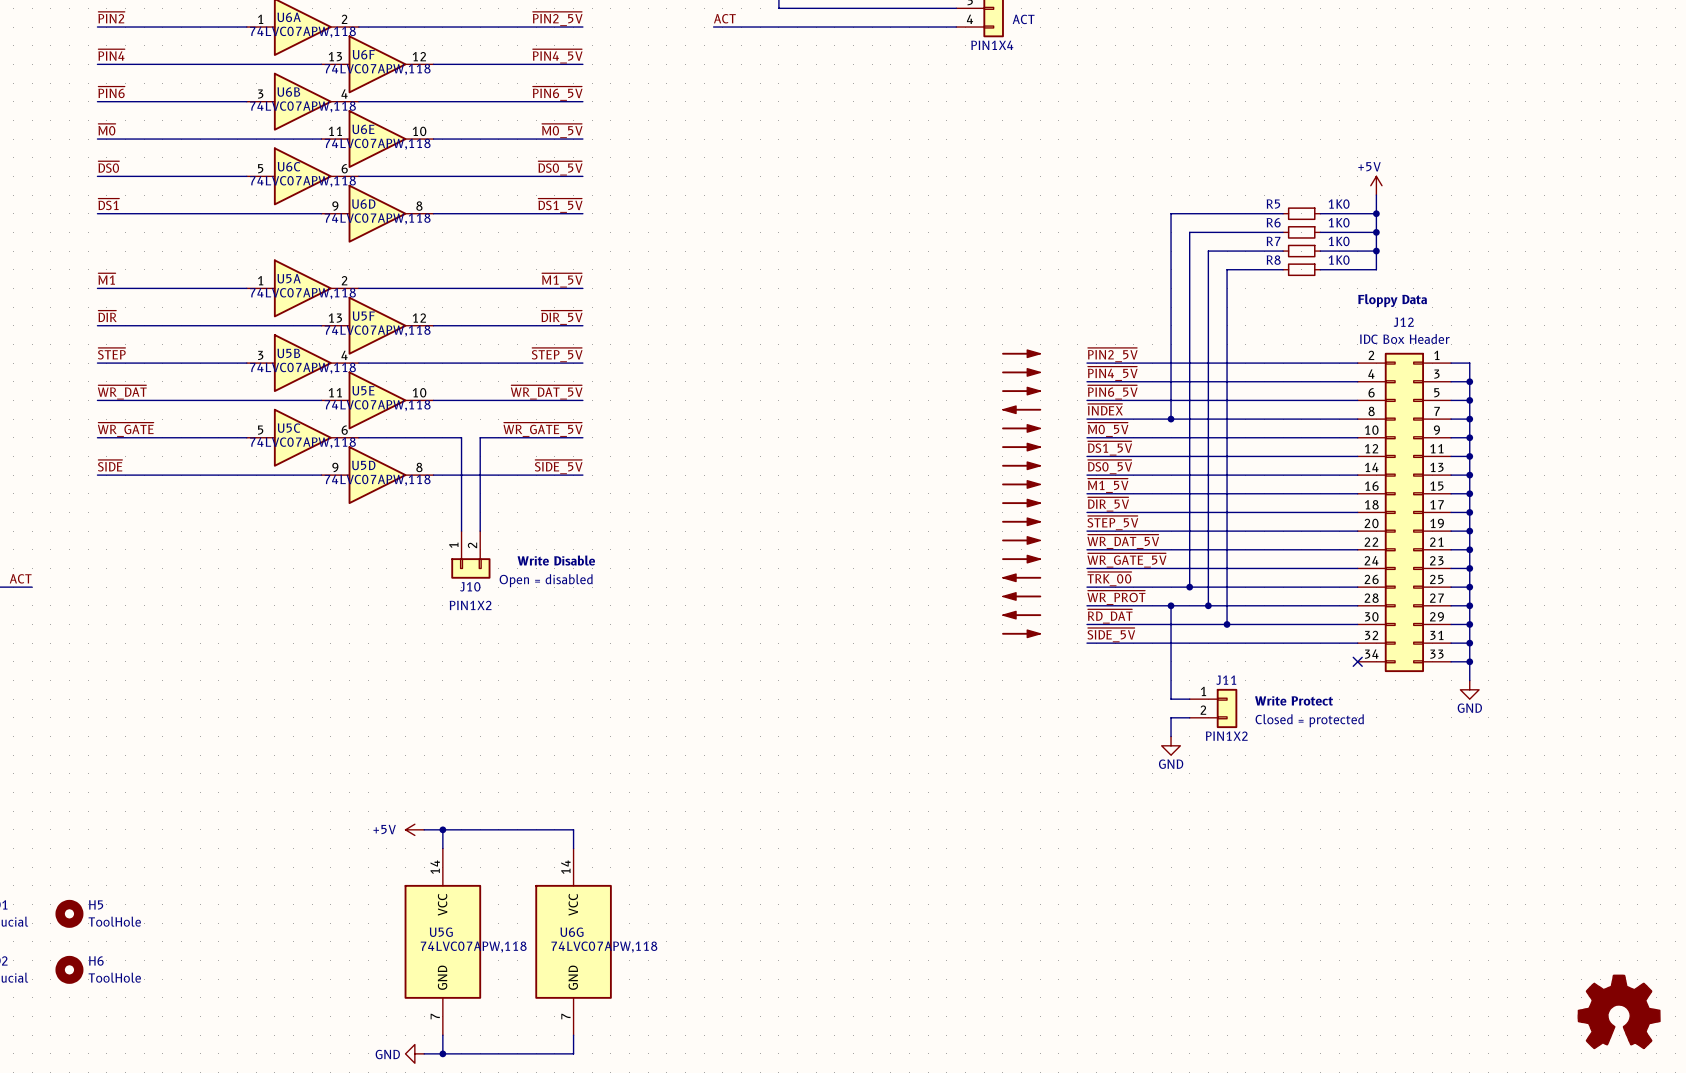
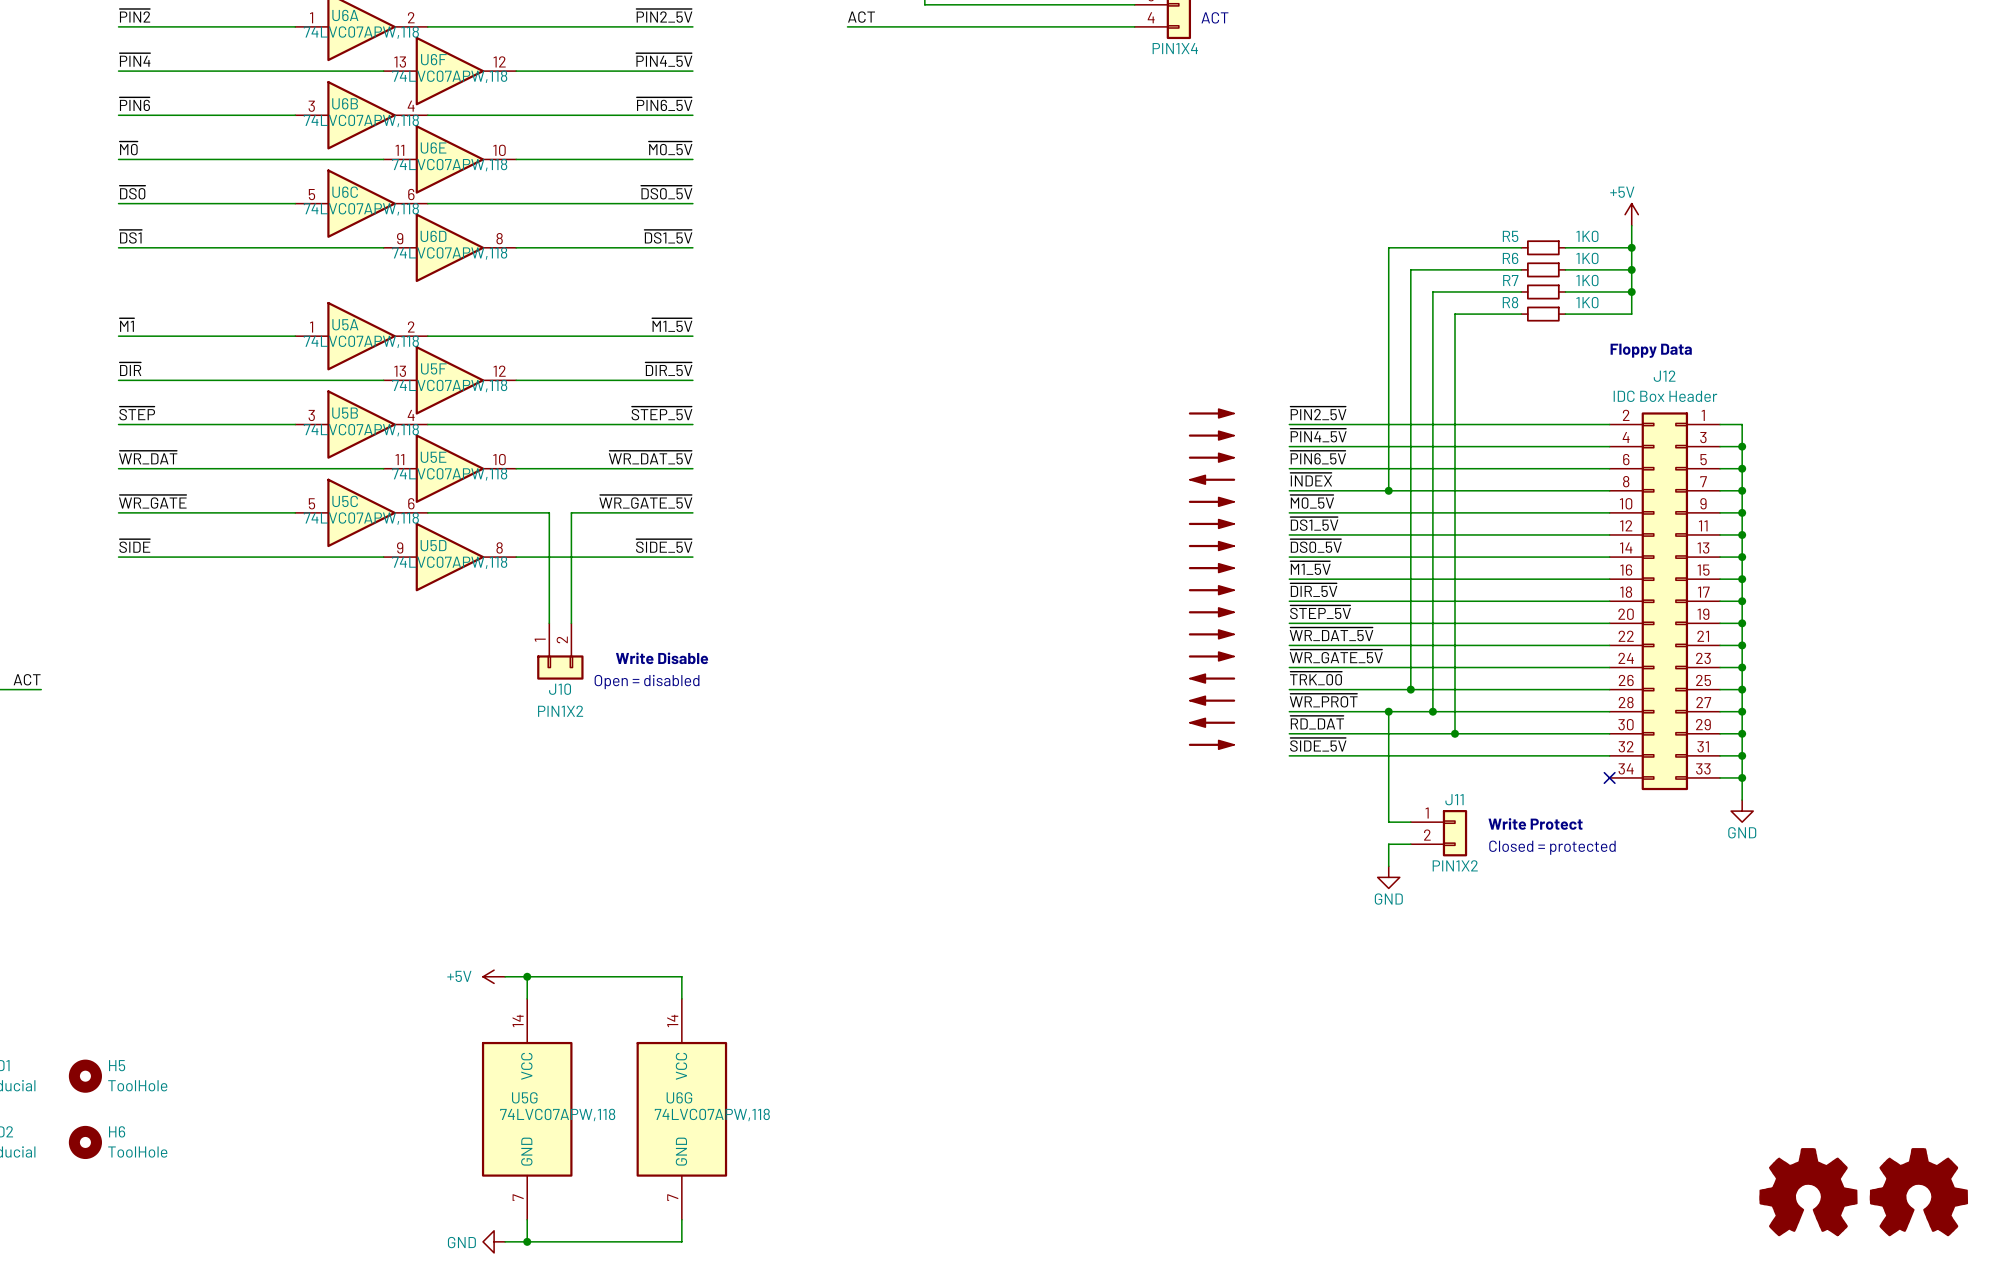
part: none -> (1808, 1192)

